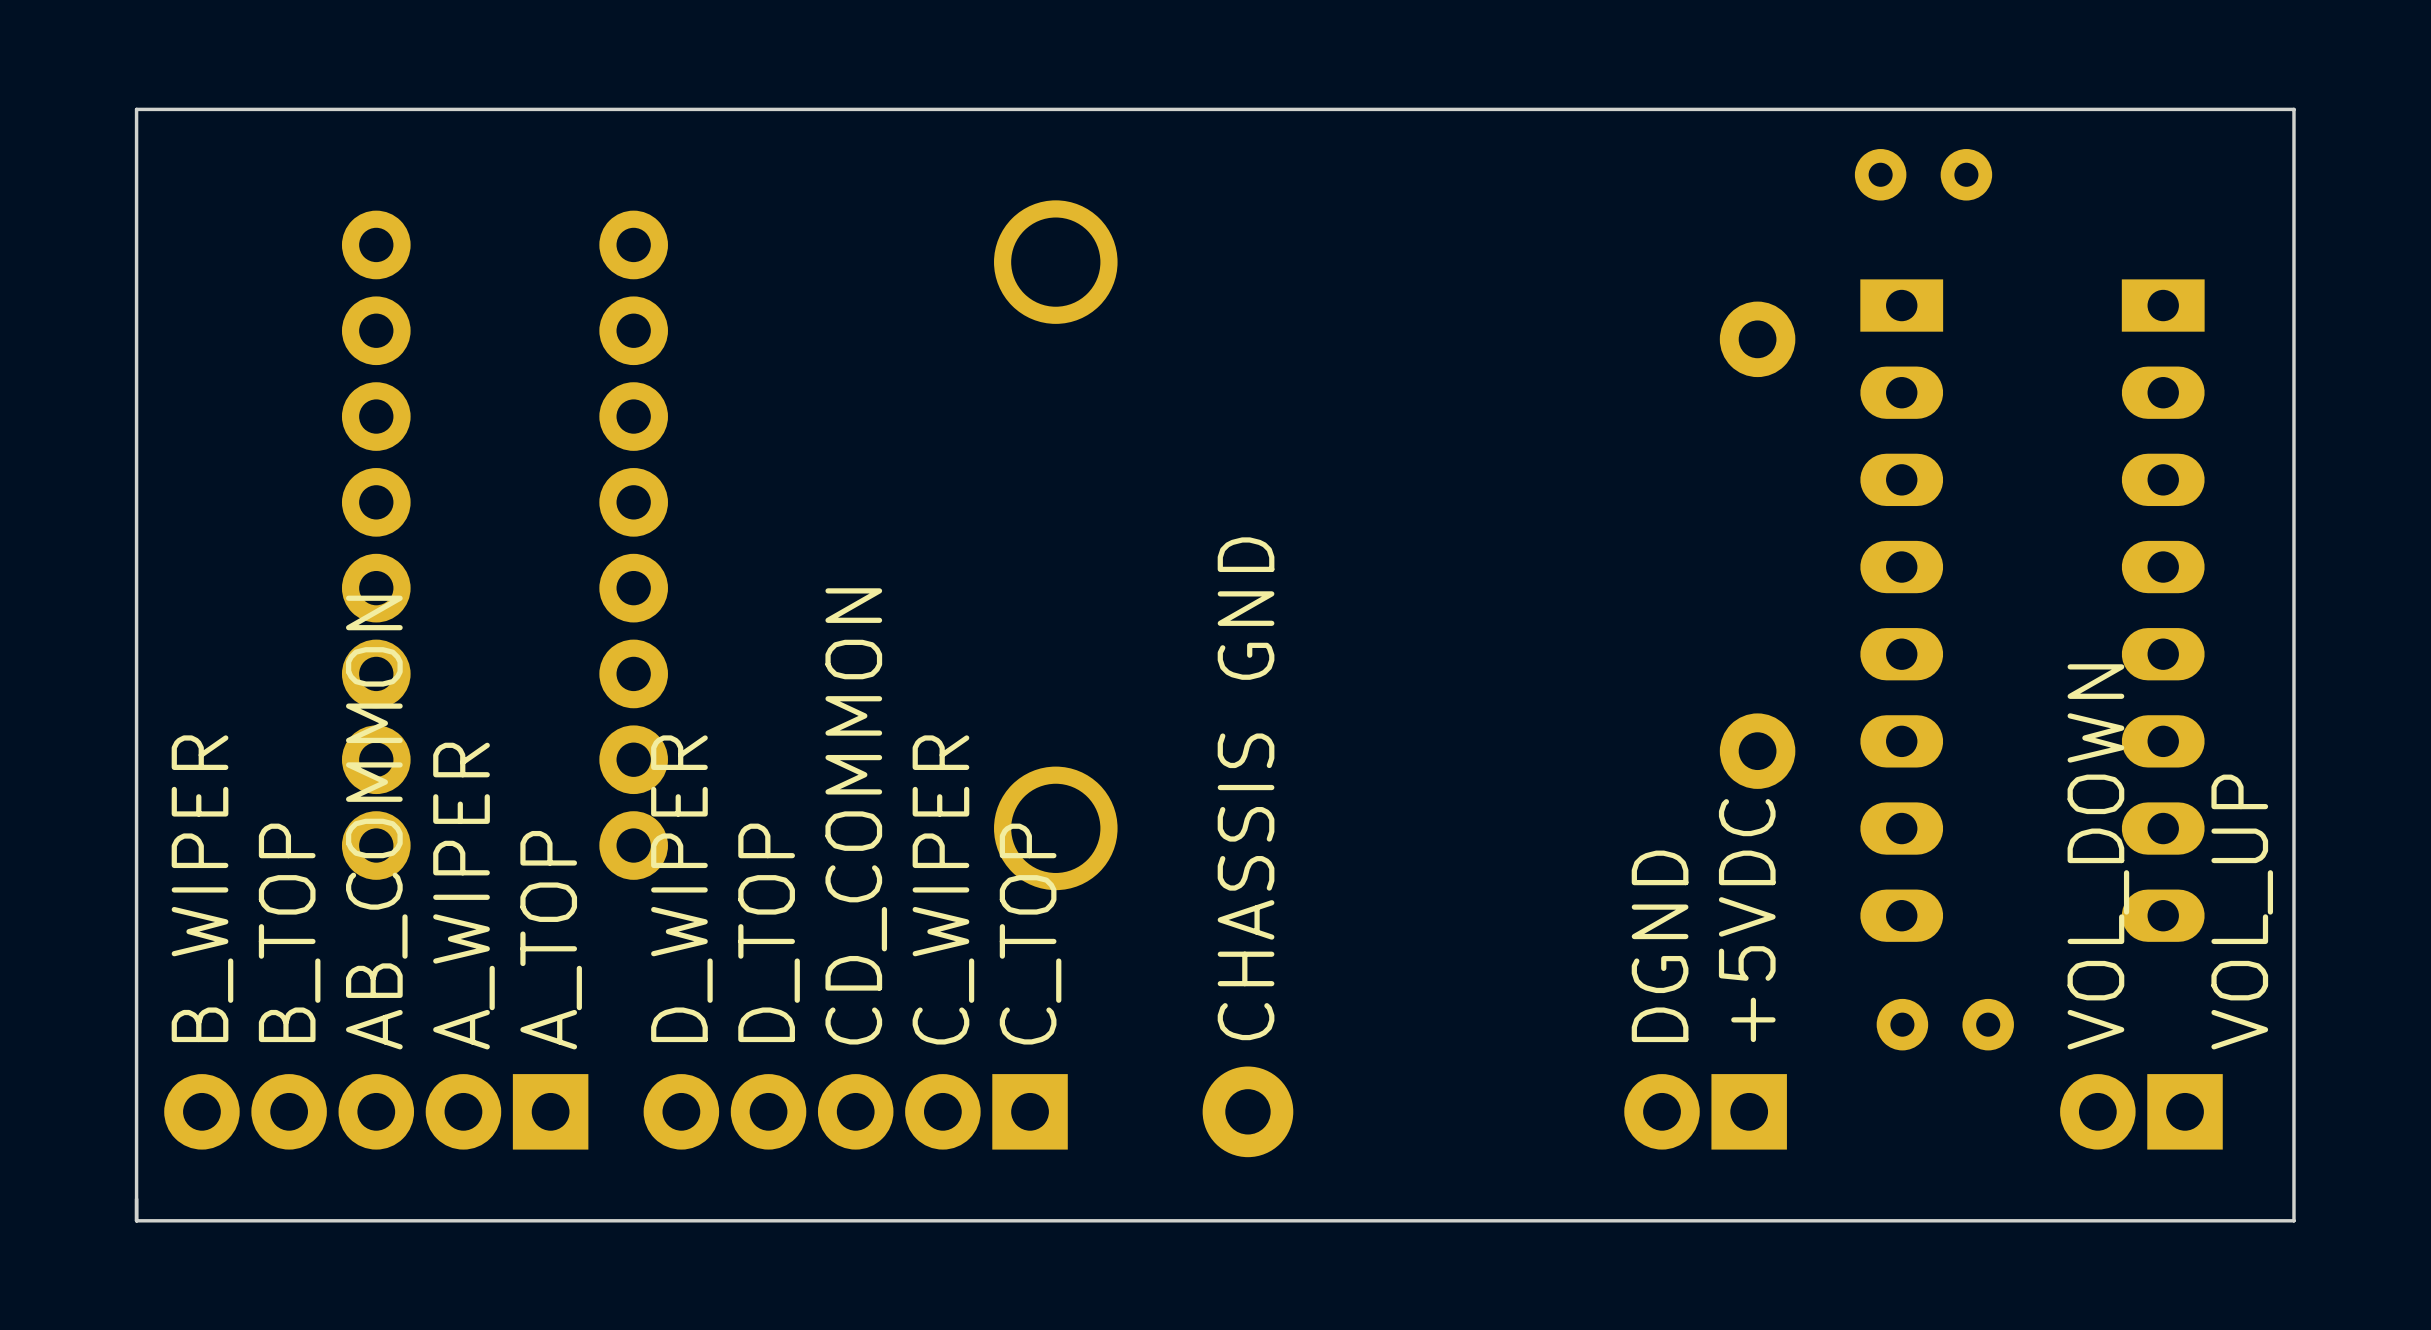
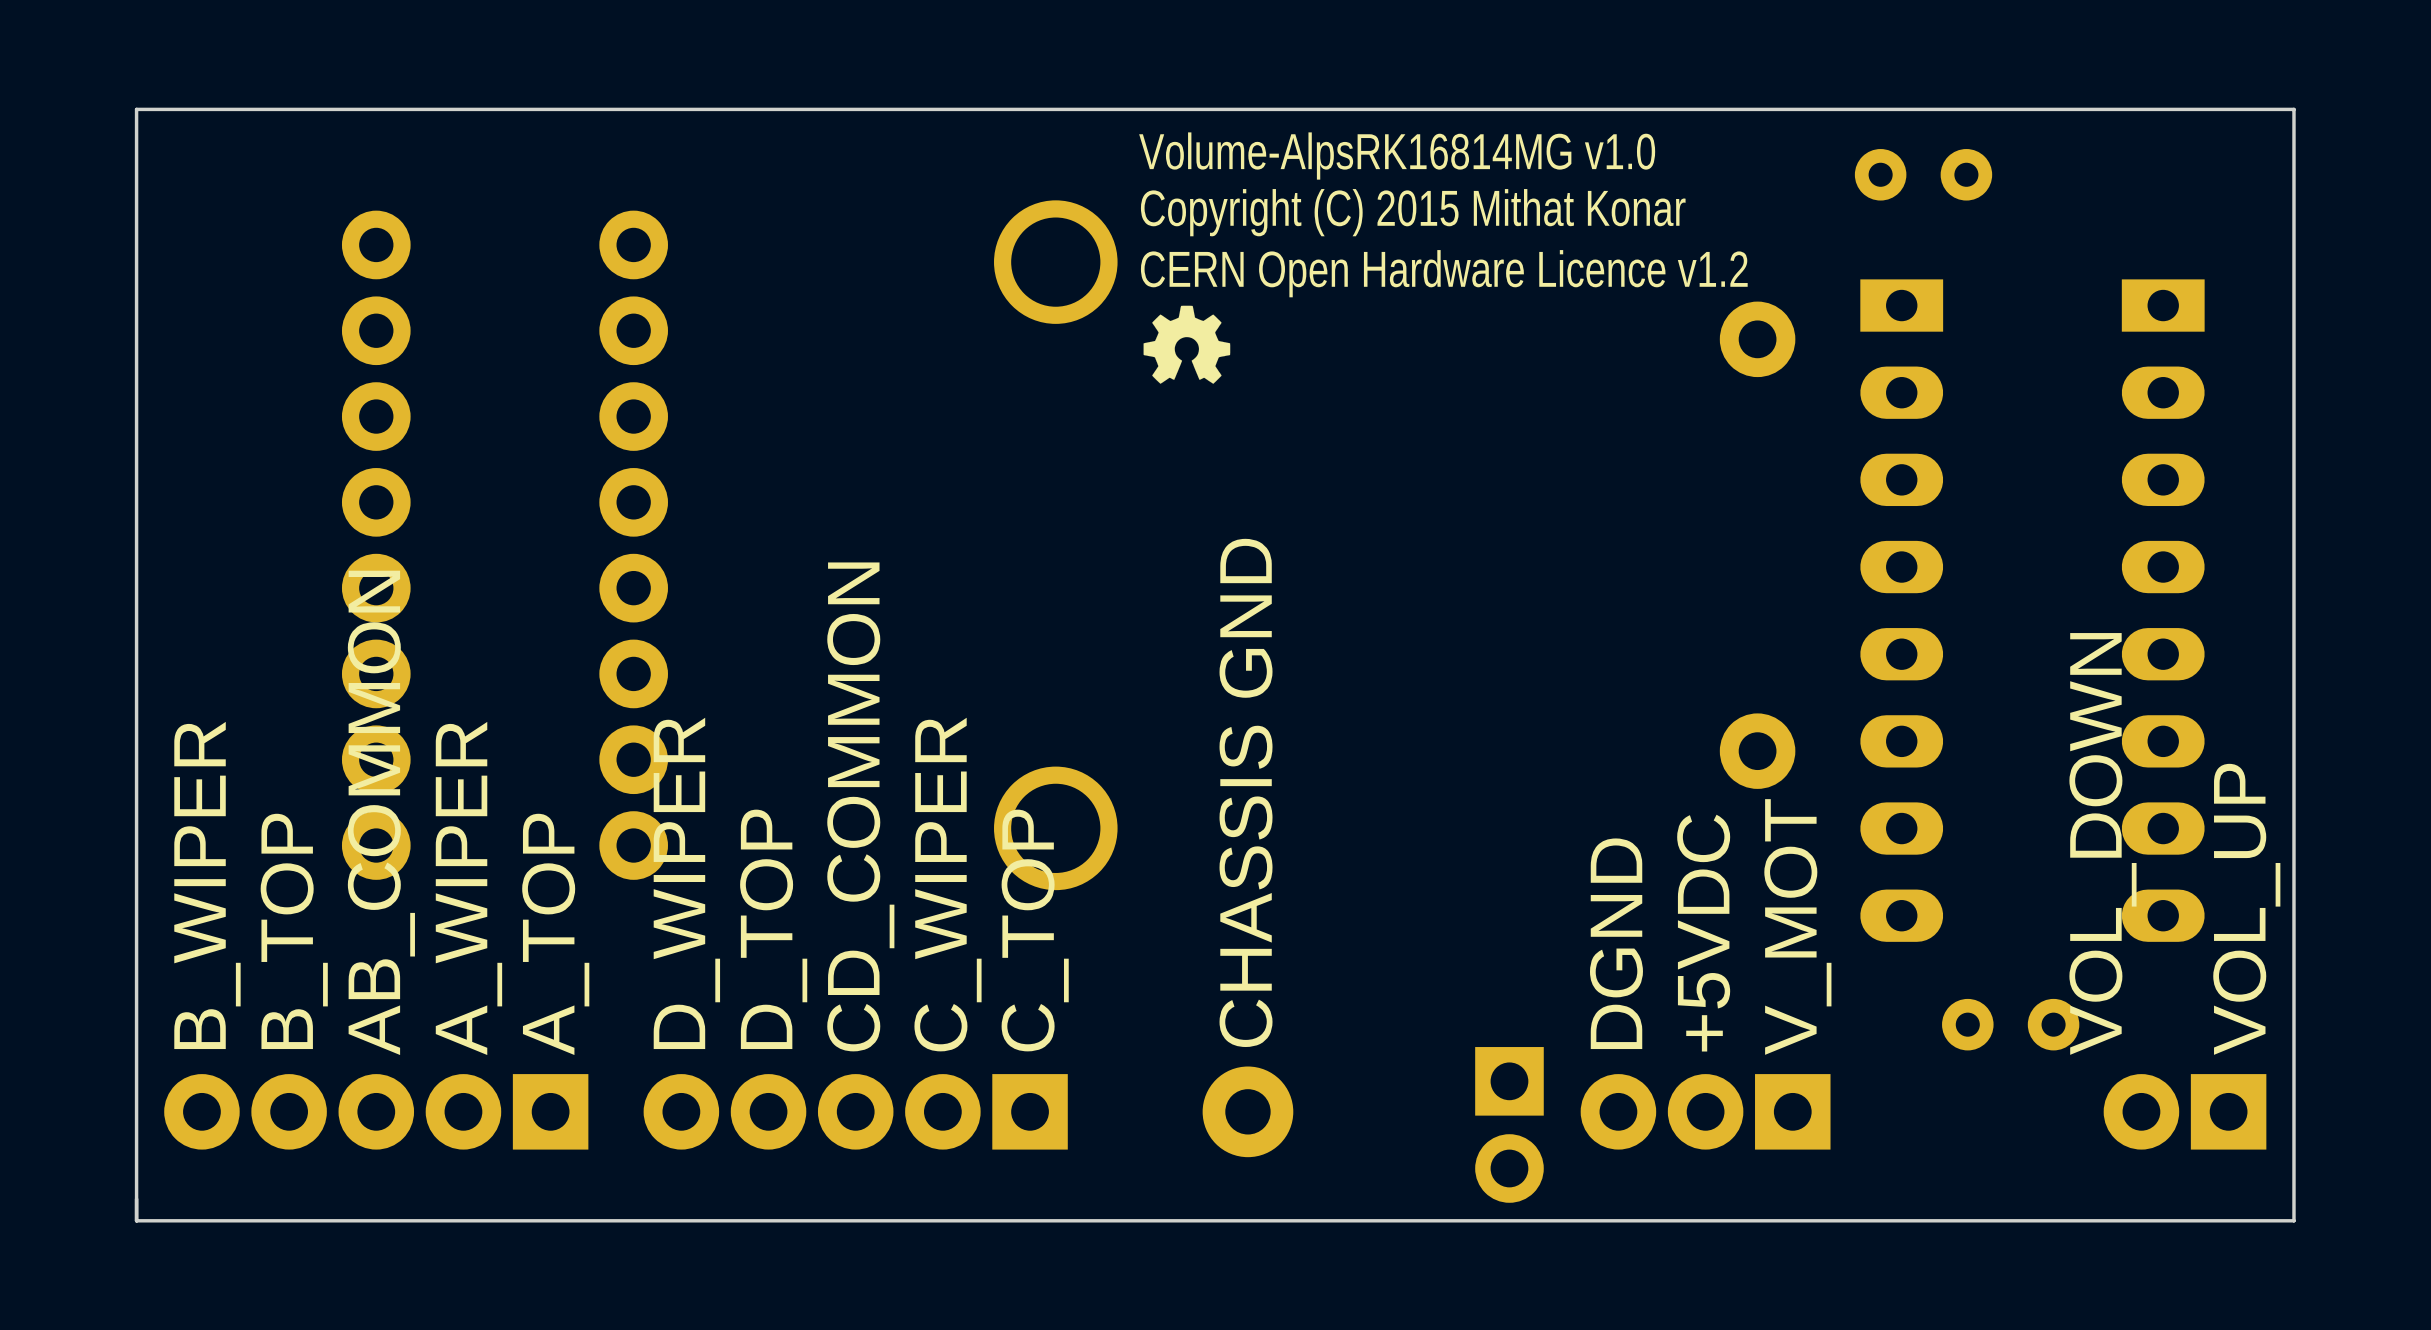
text: none -> Volume-AlpsRK16814MG v1.0 (1397, 156)
text: none -> Copyright (C) 2015 Mithat Konar (1413, 212)
text: none -> CERN Open Hardware Licence v1.2 (1444, 273)
drawing: none -> [1143, 305, 1231, 384]
text position: +5VDC (1747, 920) -> +5VDC (1703, 933)
text: none -> V_MOT (1797, 926)
text position: DGND (1660, 946) -> DGND (1616, 943)
part position: (1945, 1024) -> (2010, 1024)
part footprint: [1624, 1074, 1787, 1150] -> [1580, 1074, 1831, 1150]
part position: (2141, 1111) -> (2185, 1111)
part: none -> (1509, 1124)

